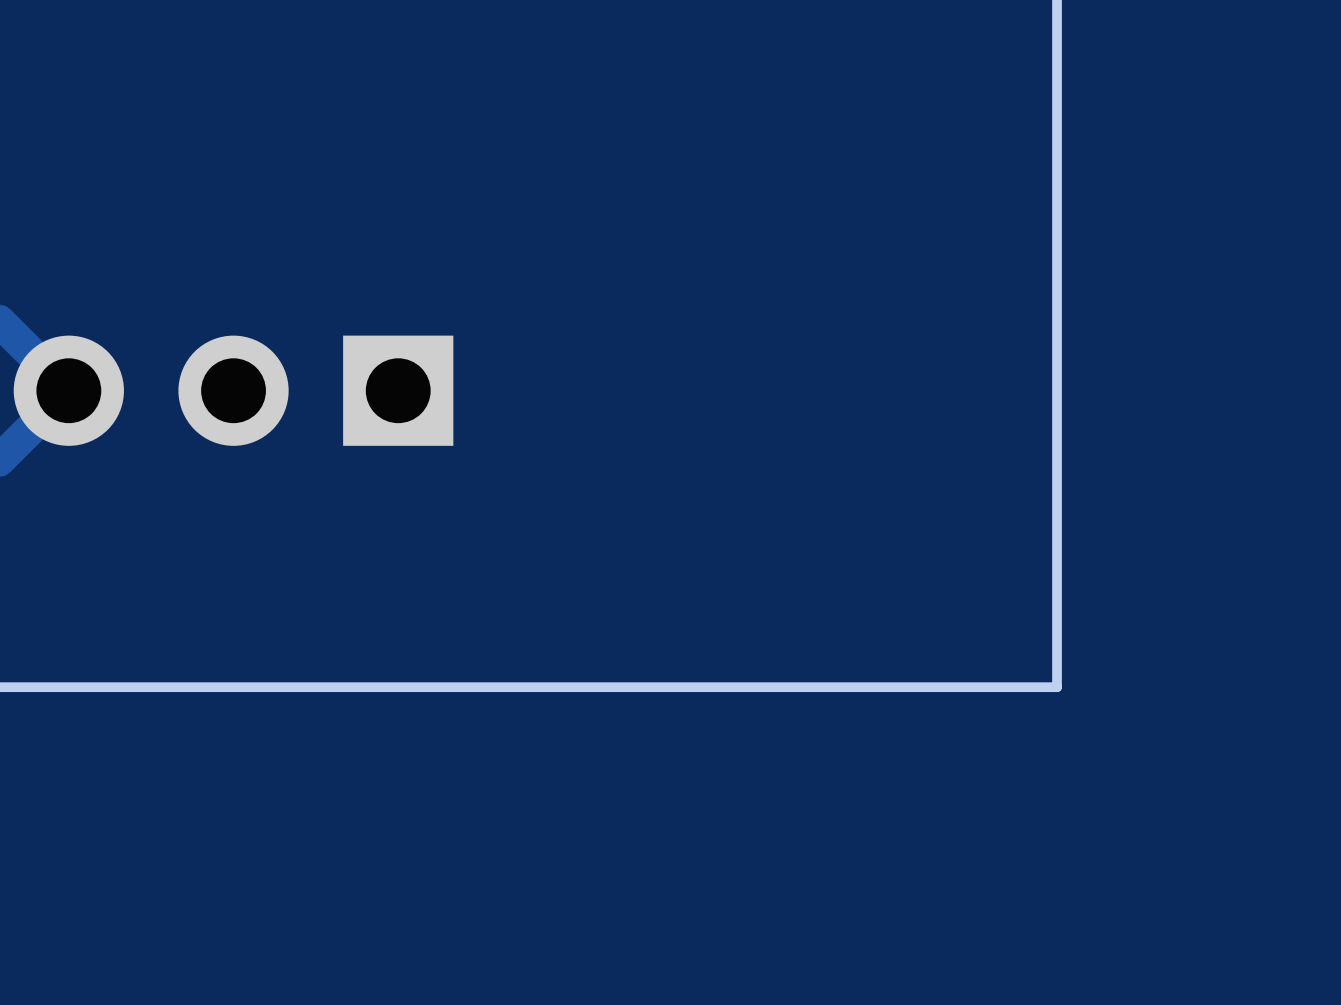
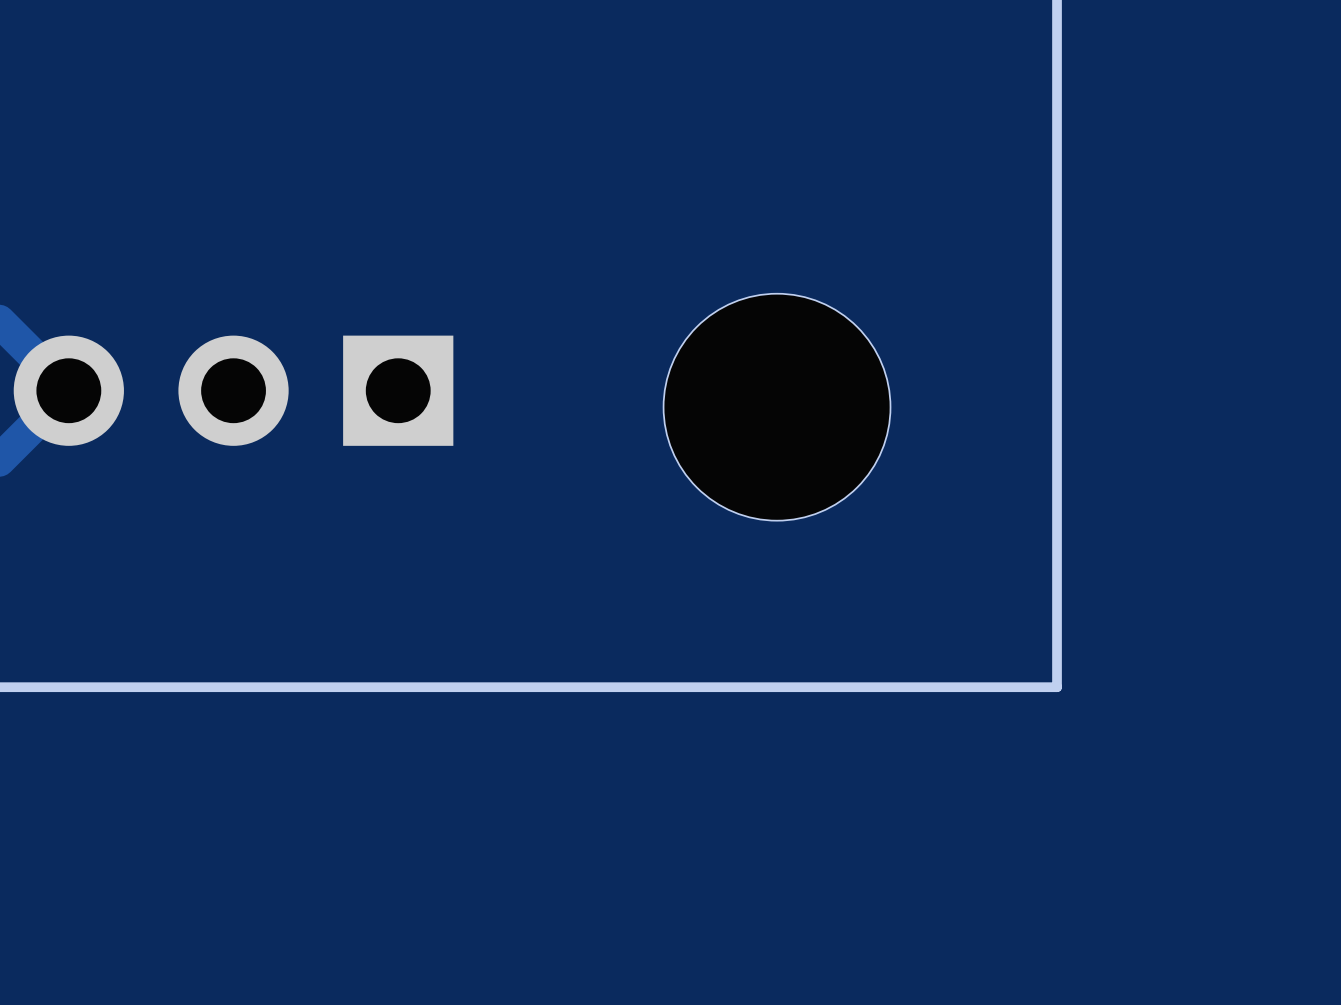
part: none -> (777, 407)

